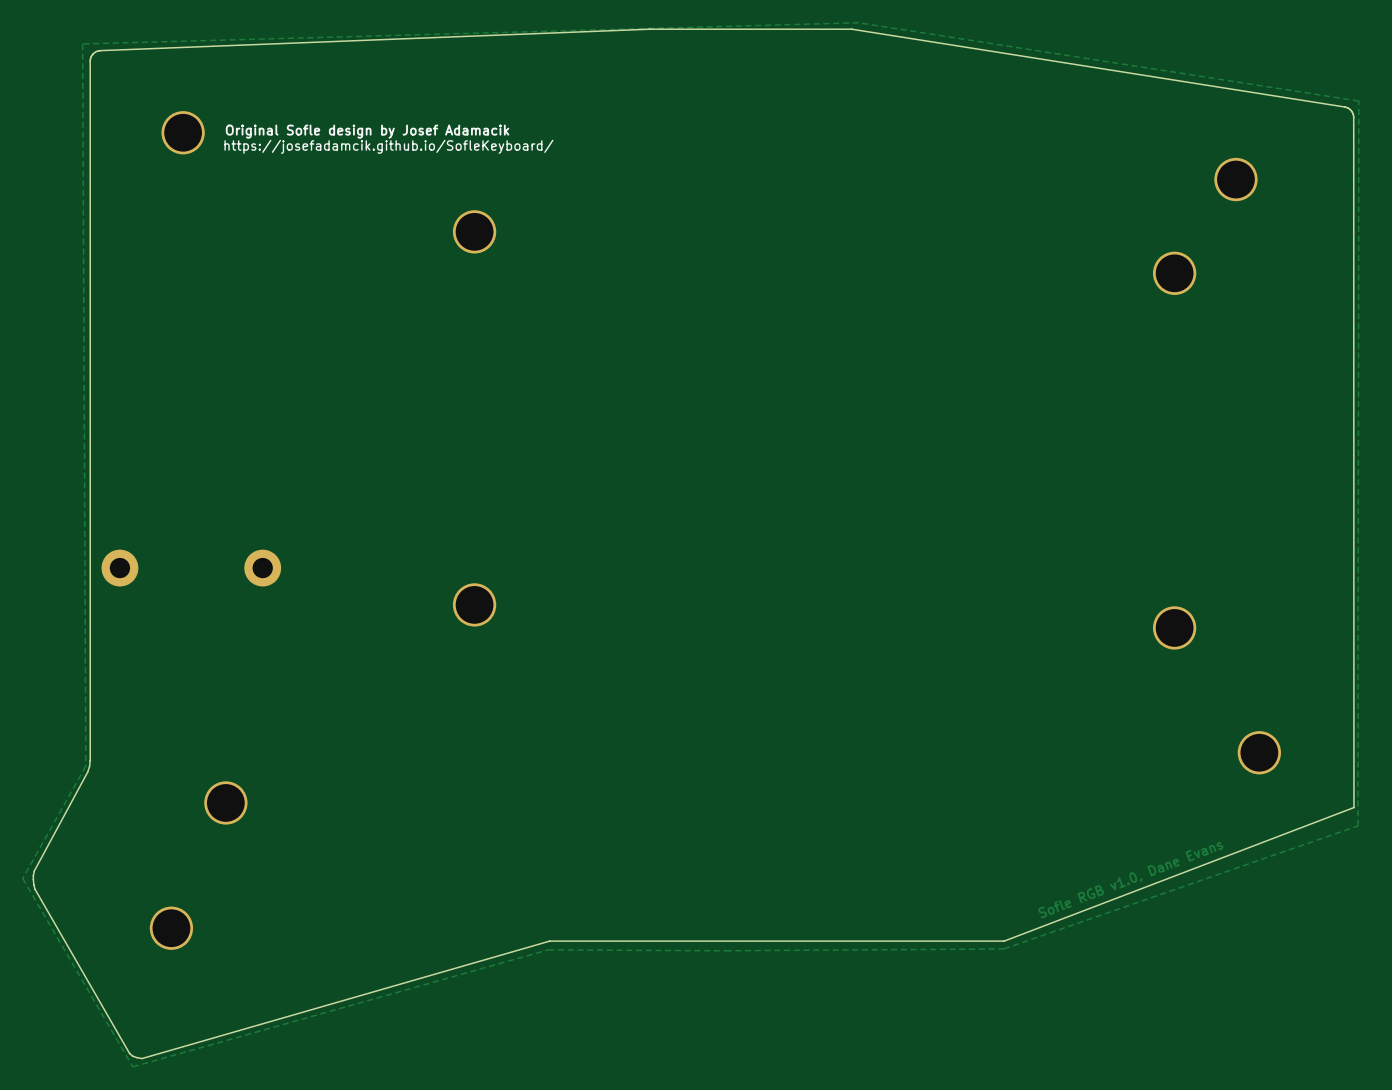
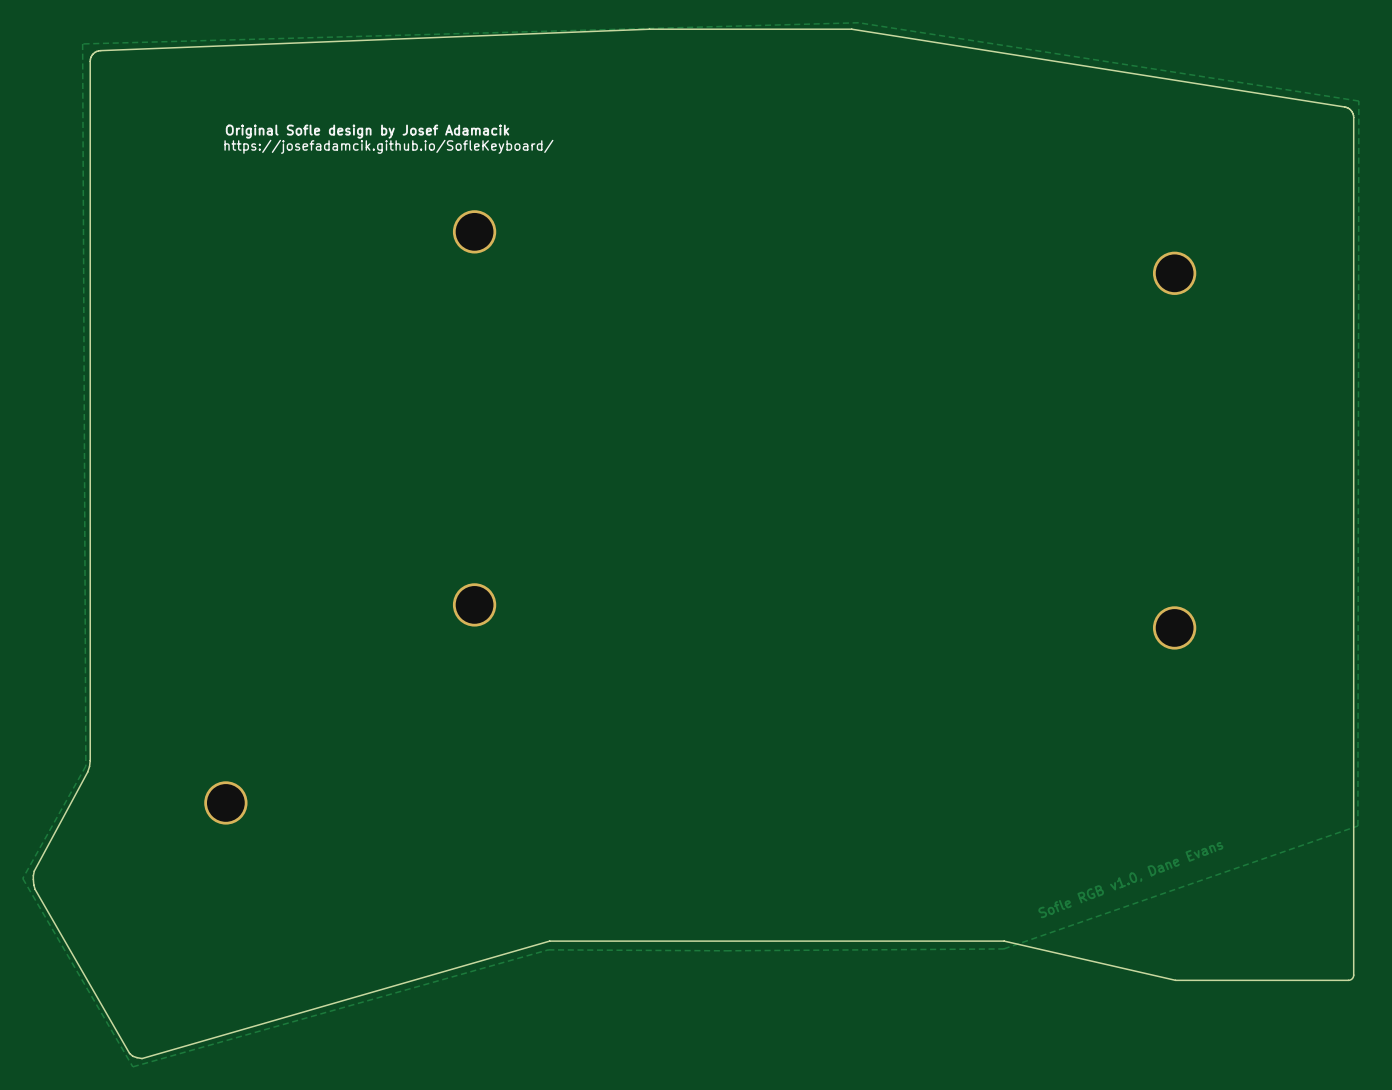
board edge: (1353, 117) (1353, 807) (1004, 941) -> (1353, 117) (1353, 977) (1348, 980) (1175, 980) (1004, 941)
part: (183, 132) -> none
part: (1235, 179) -> none
part: (119, 568) -> none
part: (262, 568) -> none
part: (1259, 752) -> none
part: (171, 928) -> none

